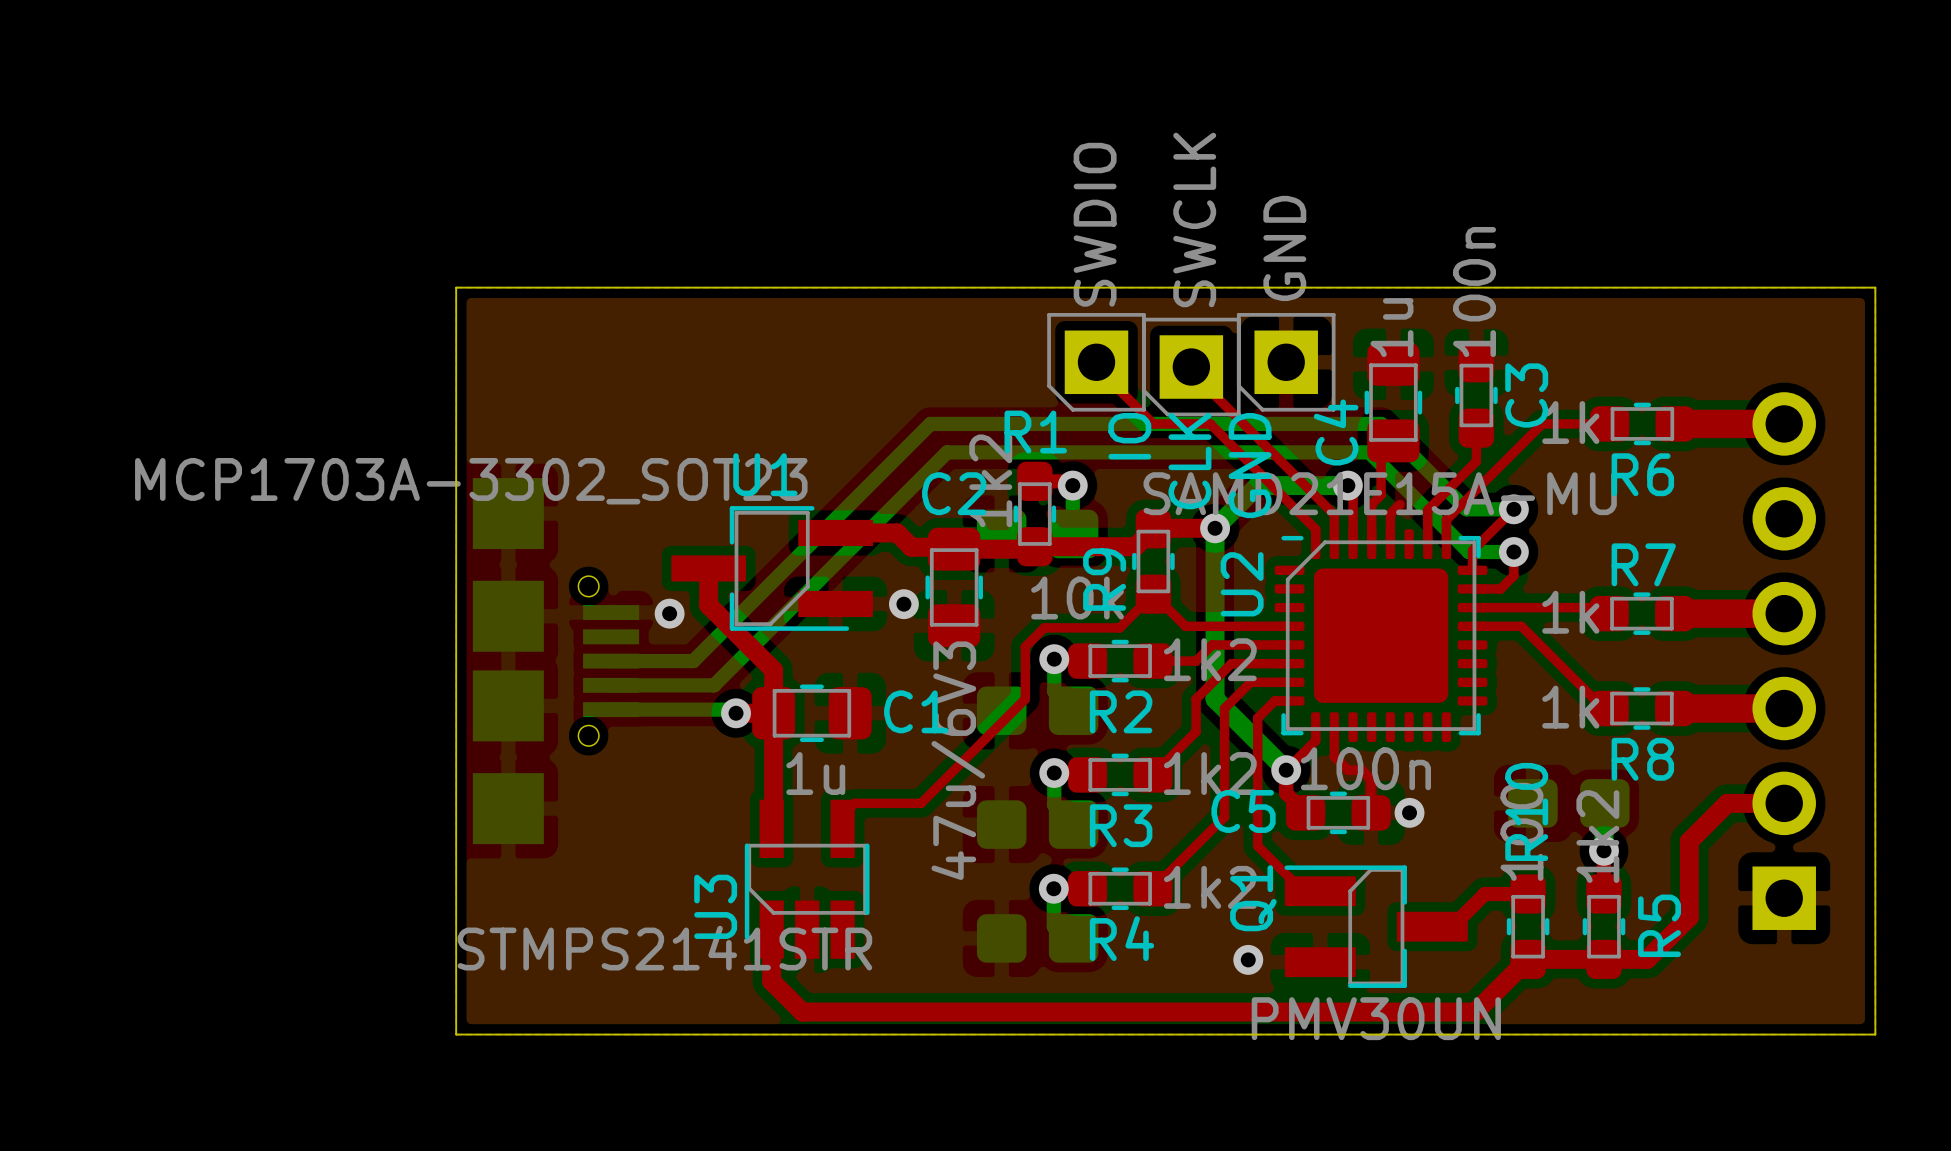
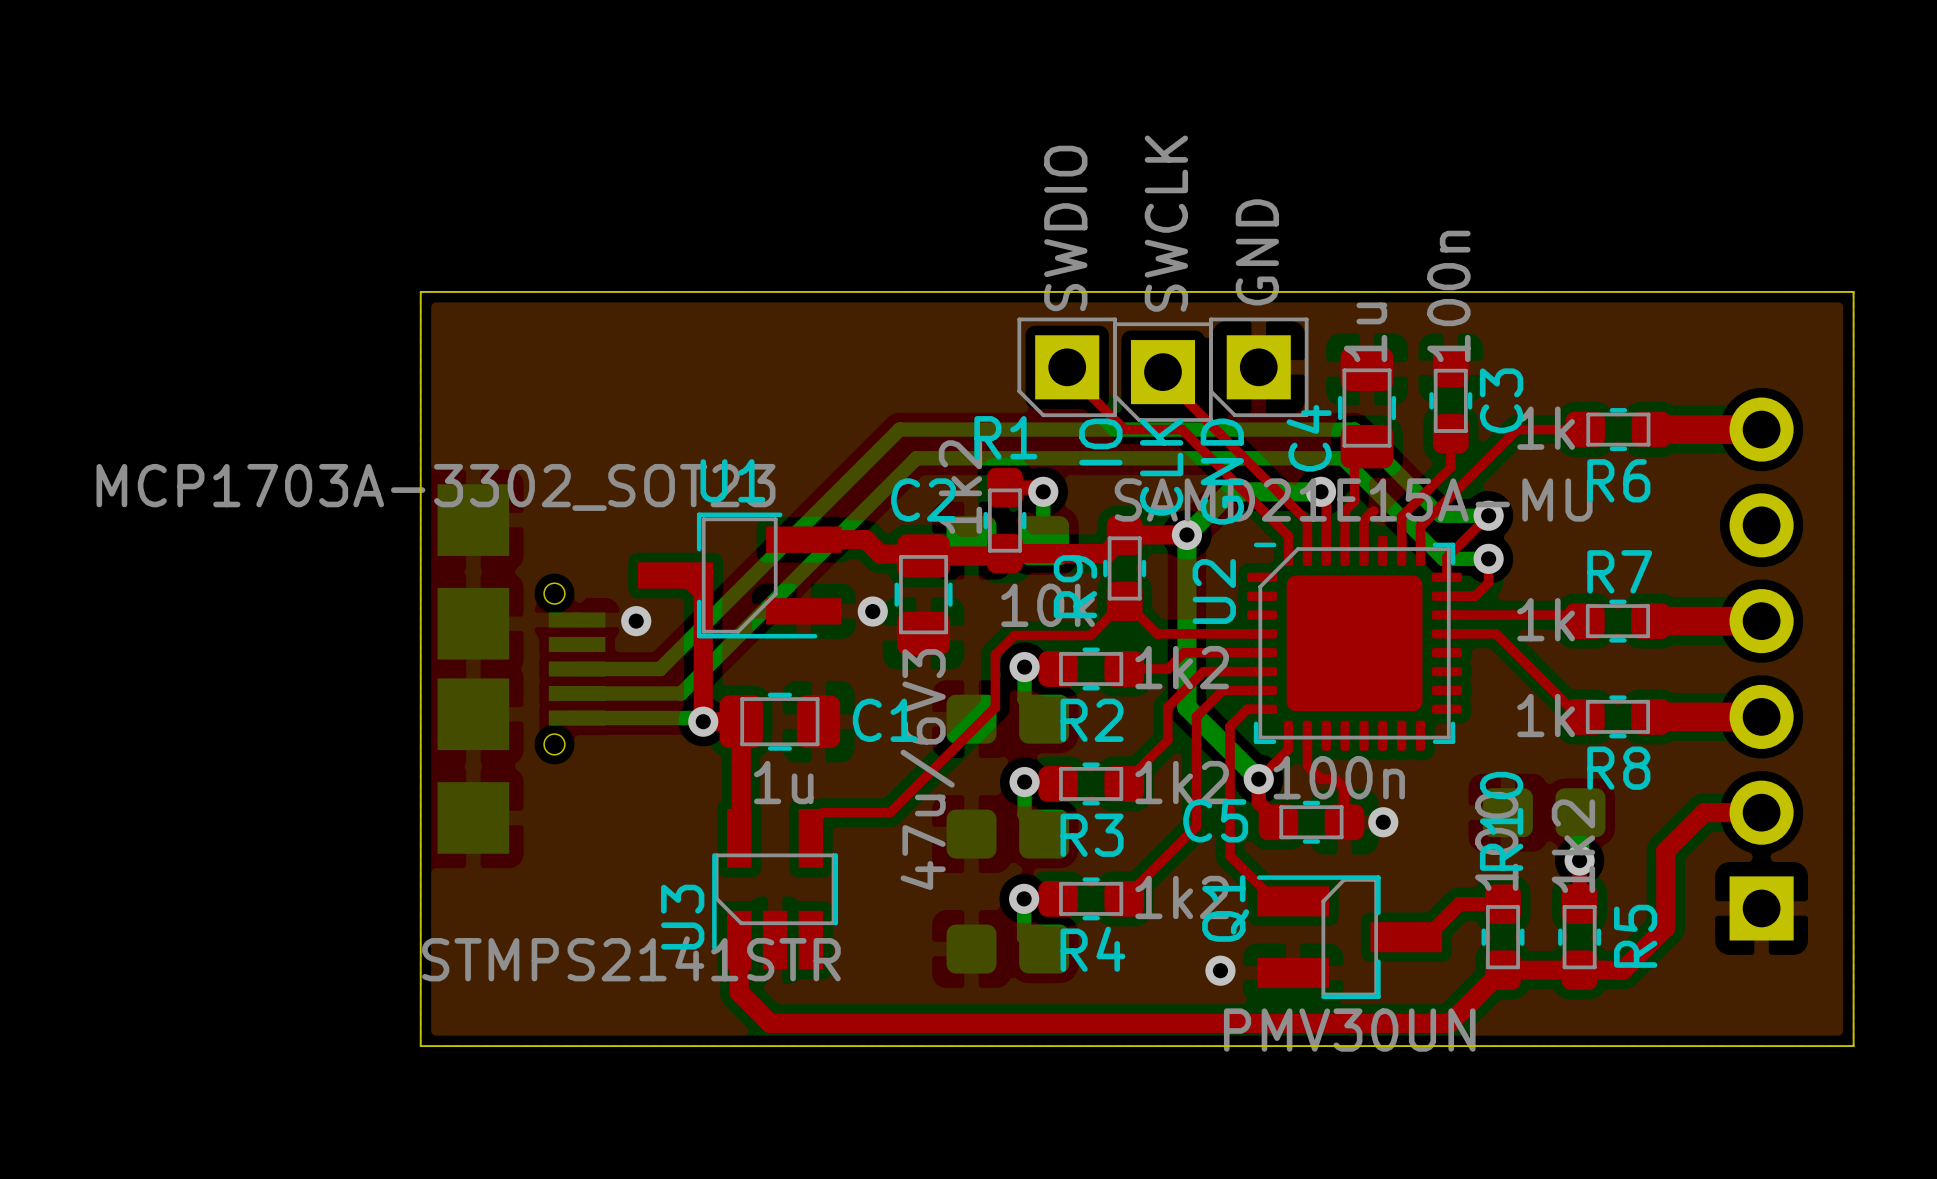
top track: (708, 568) (708, 605) (773, 670) (773, 713) -> (675, 575) (686, 575) (703, 592) (703, 721)

